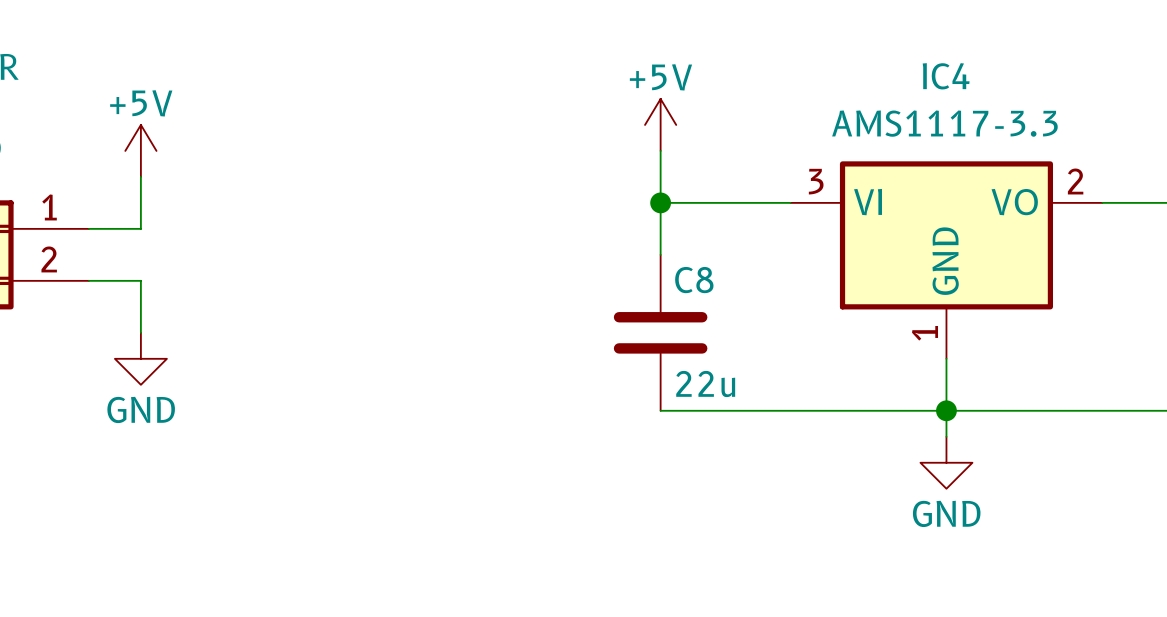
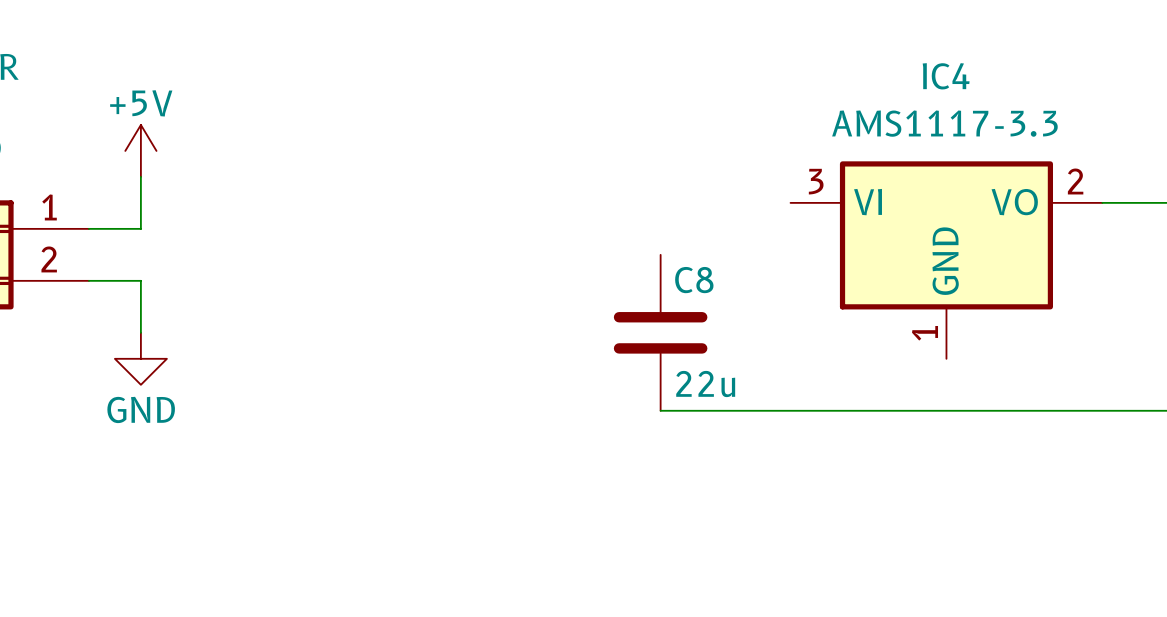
power symbol: +5V (660, 124) -> none
wire: (660, 150) (660, 254) -> none
wire: (660, 202) (790, 202) -> none
junction: (660, 202) -> none
wire: (946, 358) (946, 436) -> none
junction: (946, 410) -> none
power symbol: GND (946, 462) -> none

